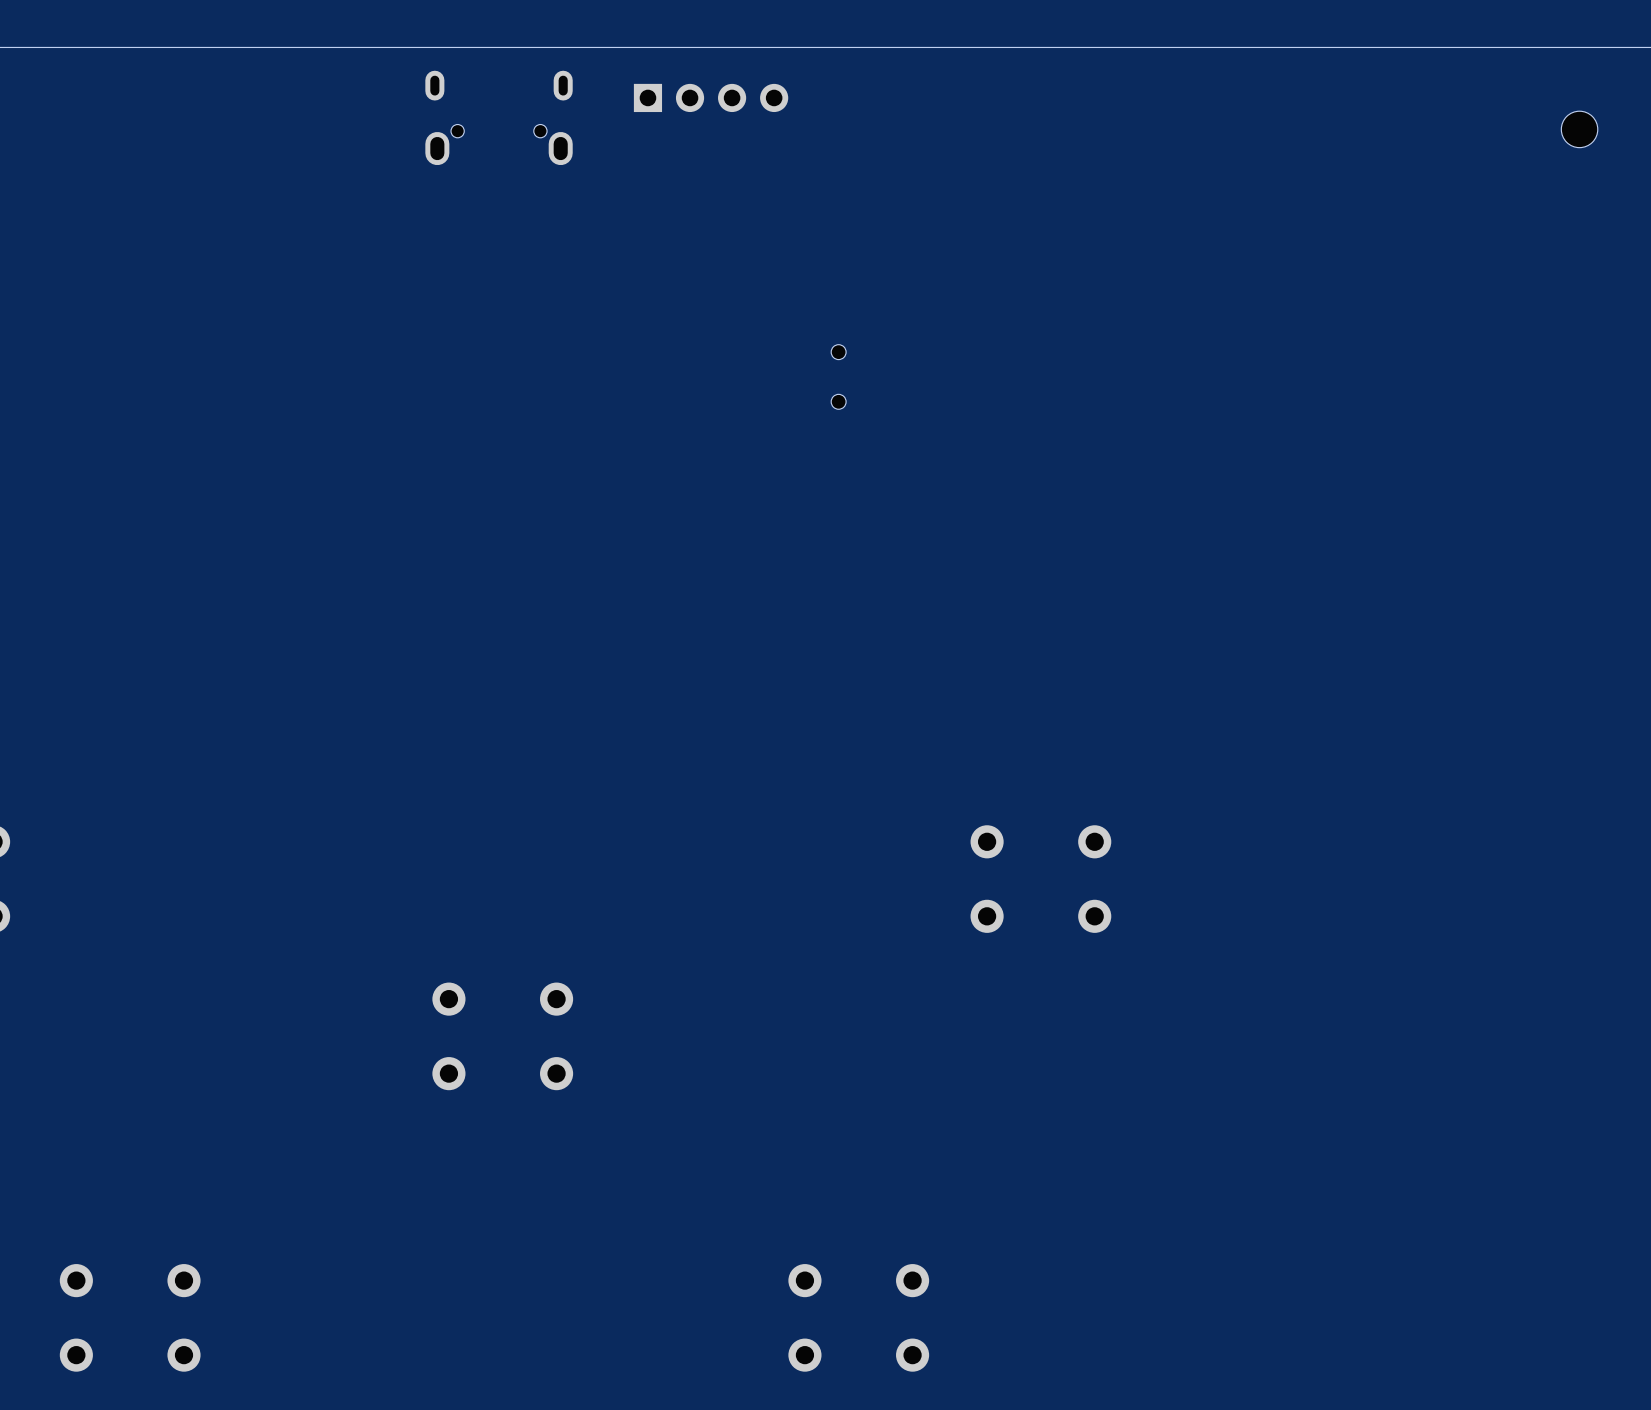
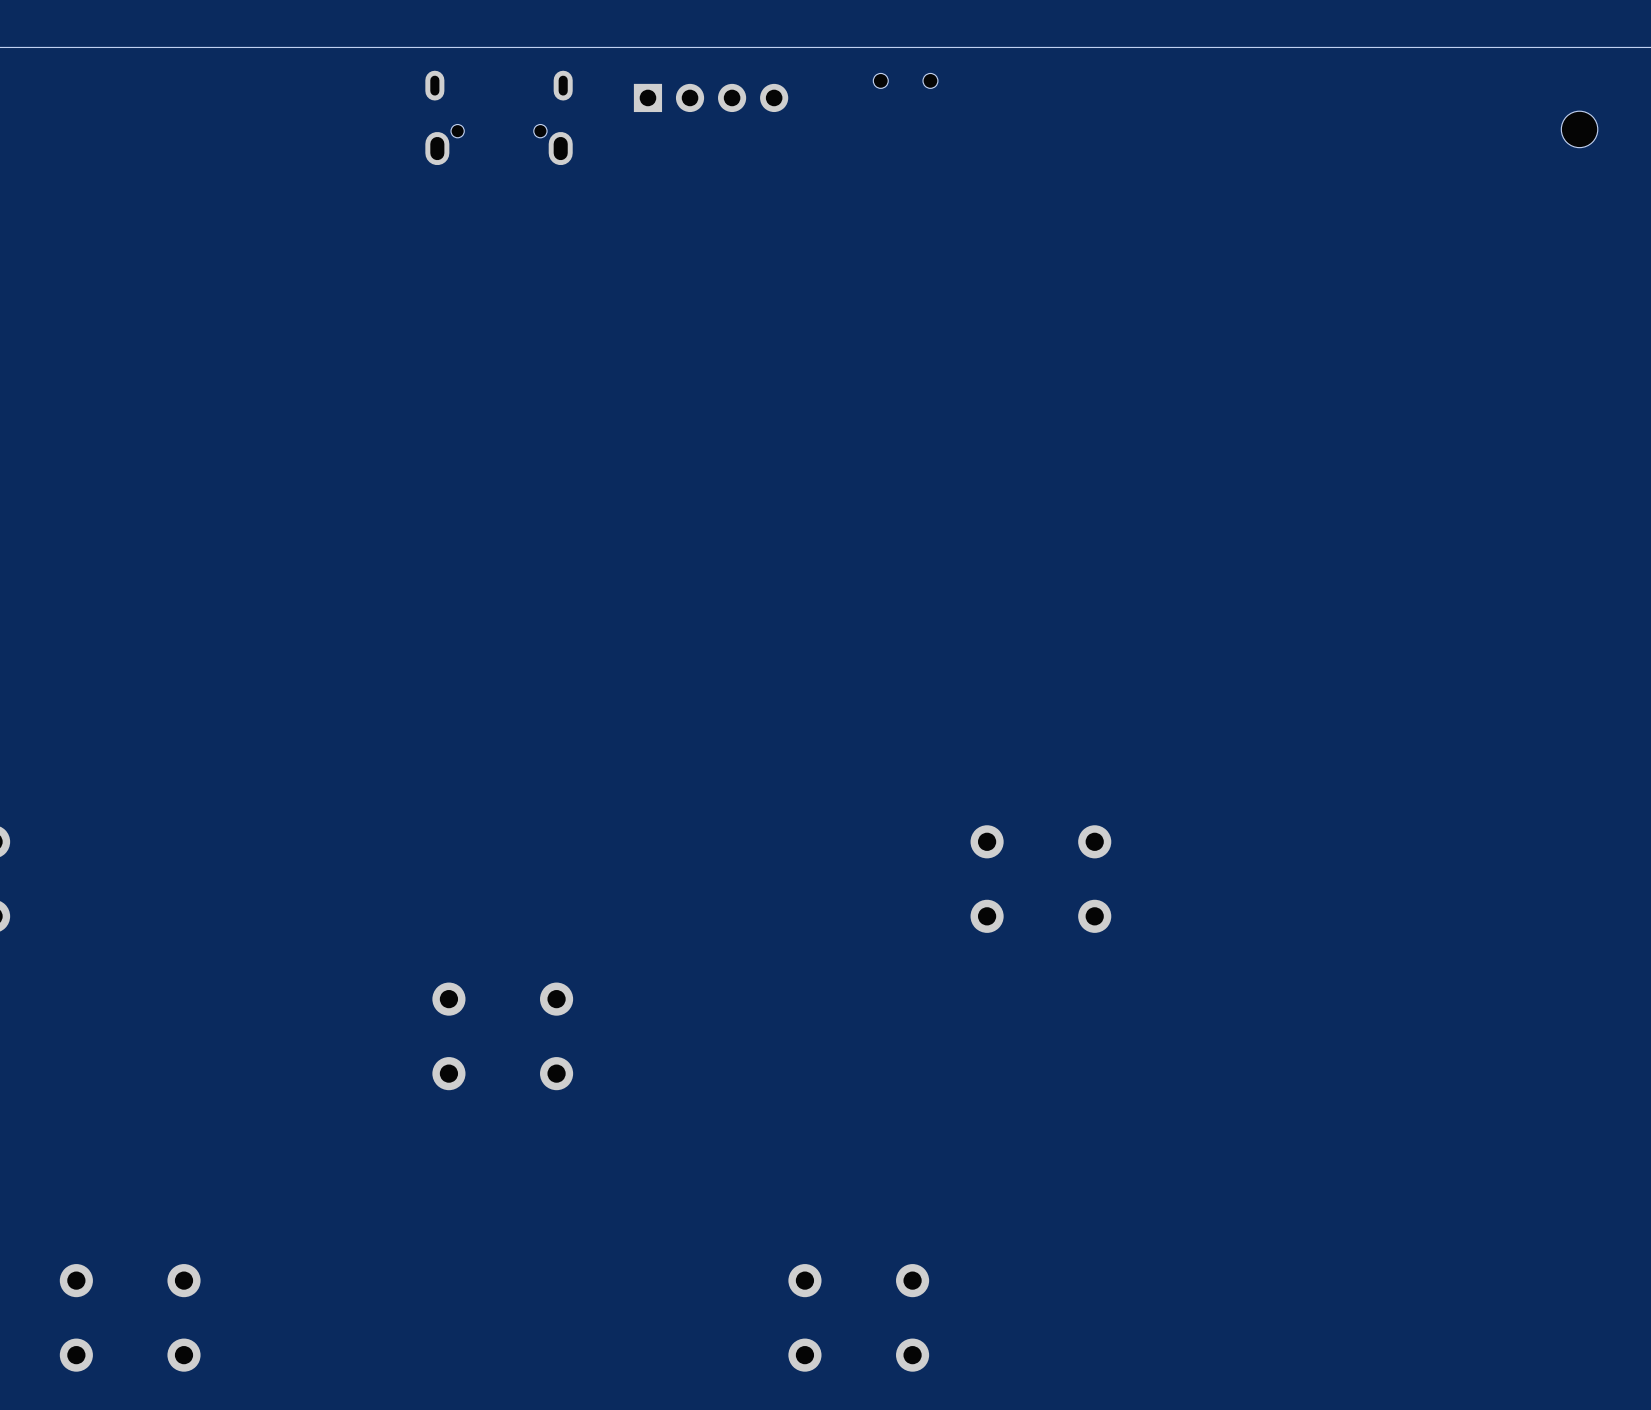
part rotation: 0° (838, 376) -> 90° clockwise (905, 80)
part position: (838, 376) -> (905, 80)

